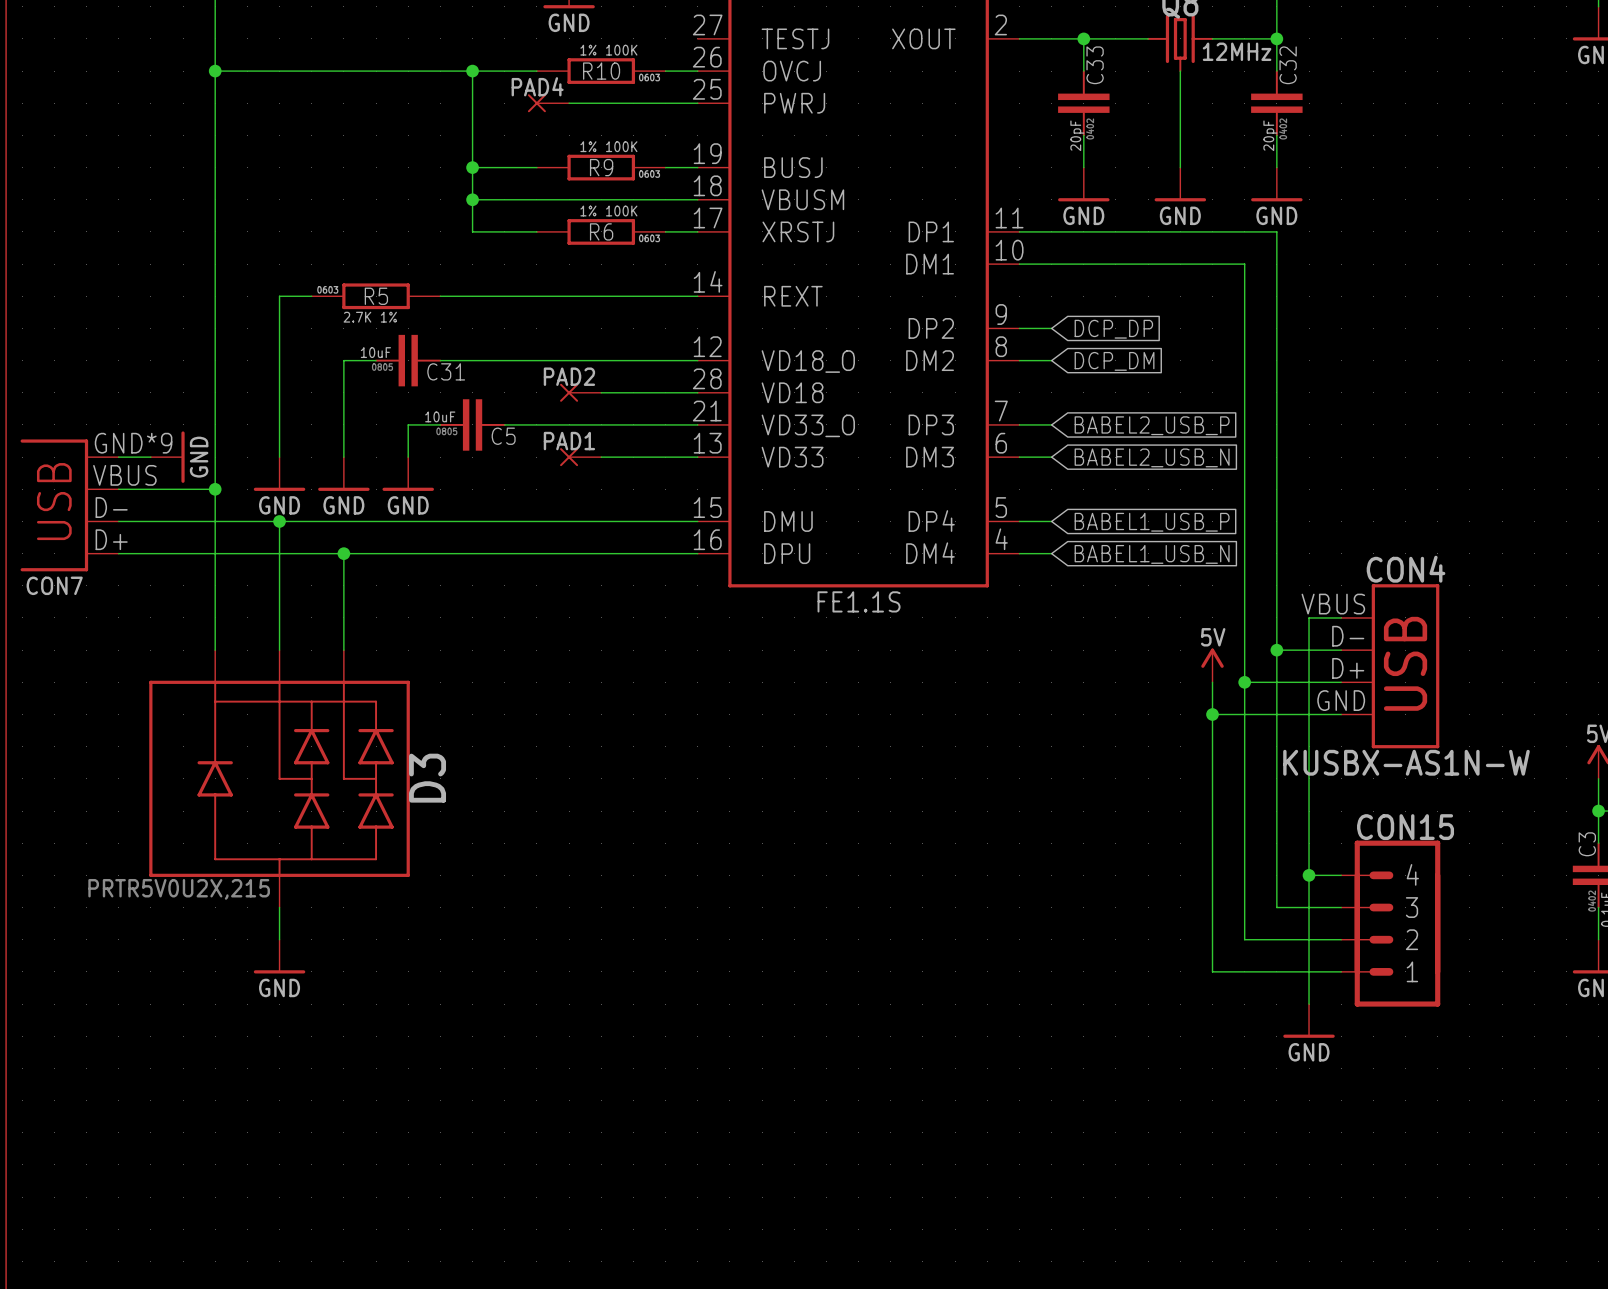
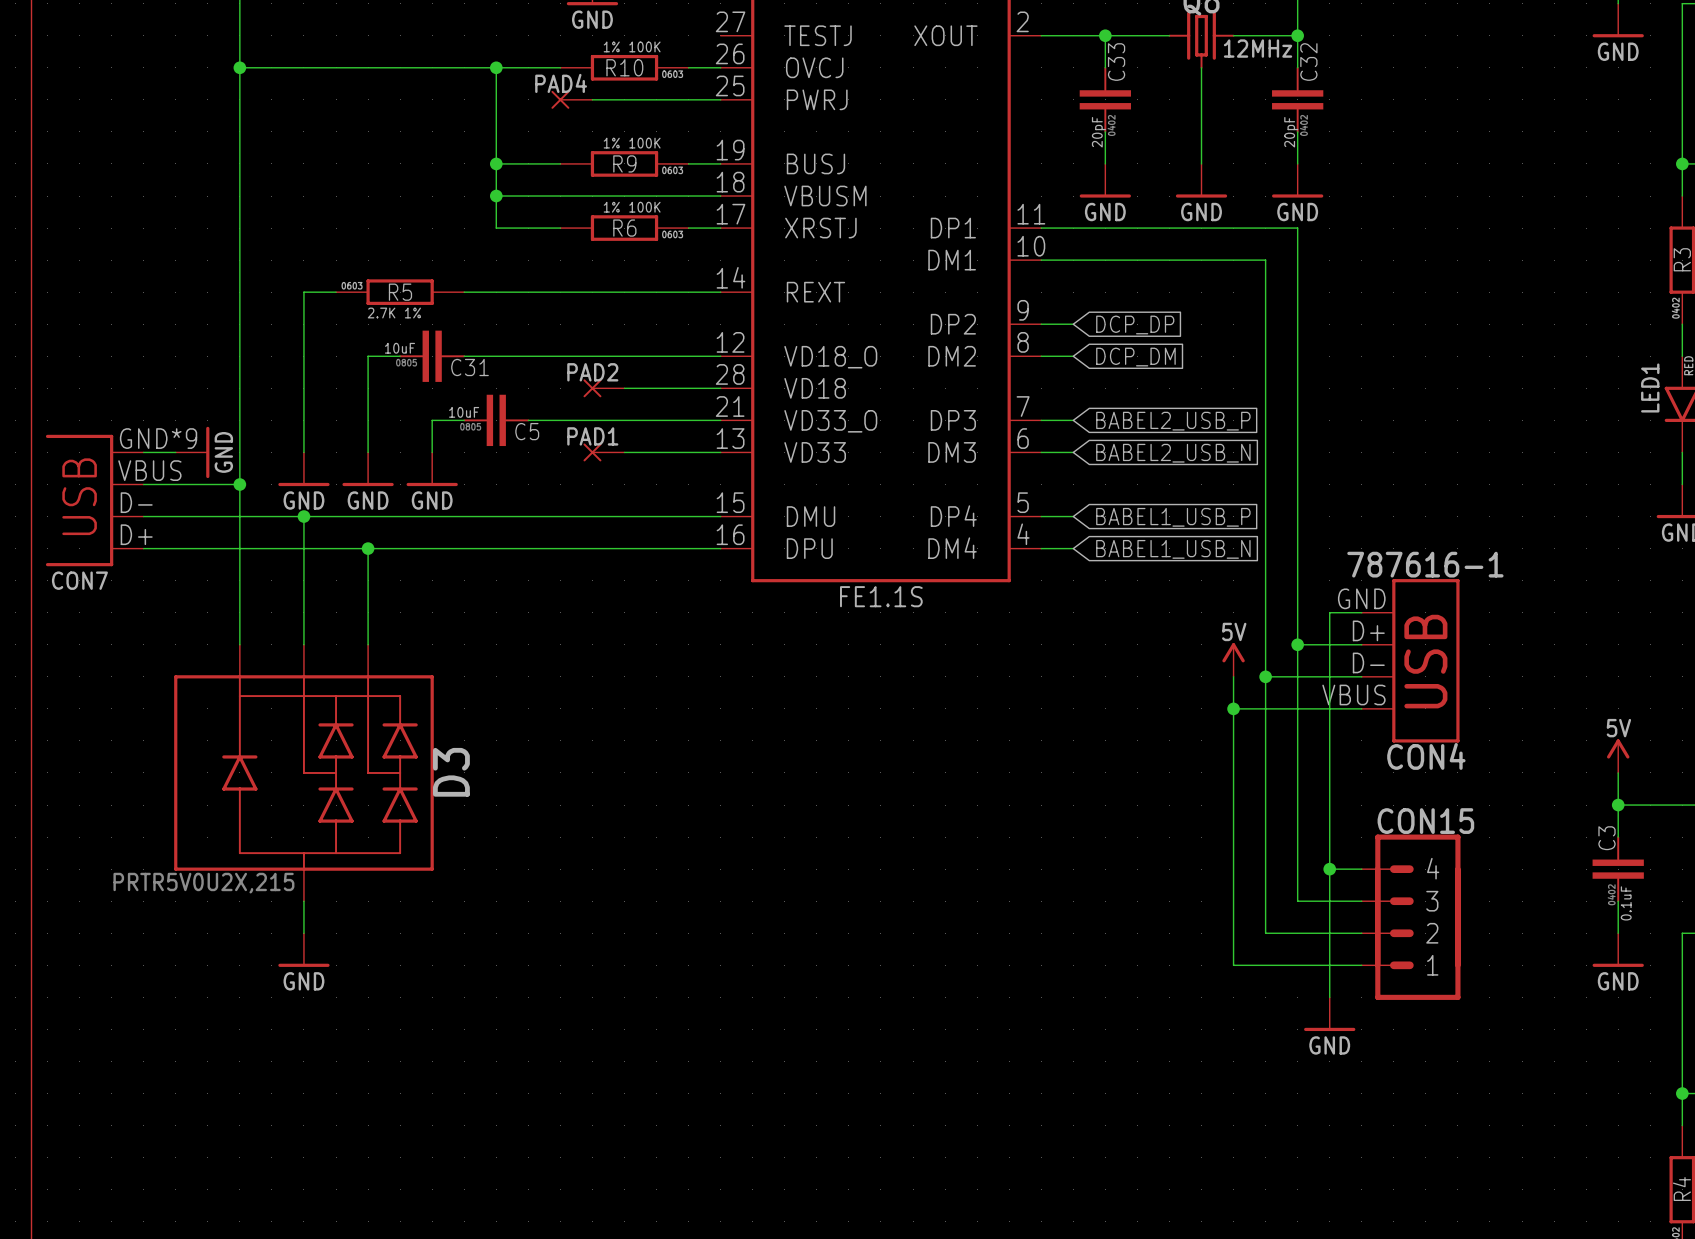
CON4 flip: as is (1405, 666) -> up-down (1425, 660)
CON4 text: KUSBX-AS1N-W (1406, 762) -> 787616-1 (1425, 564)

